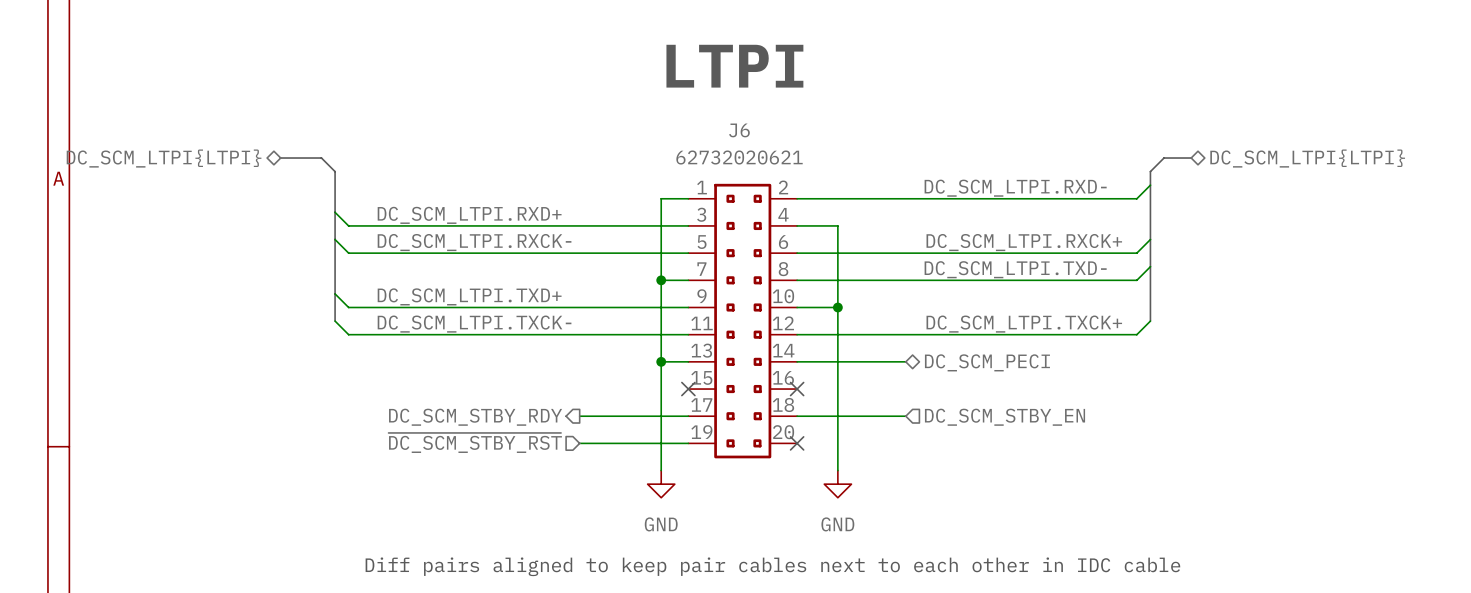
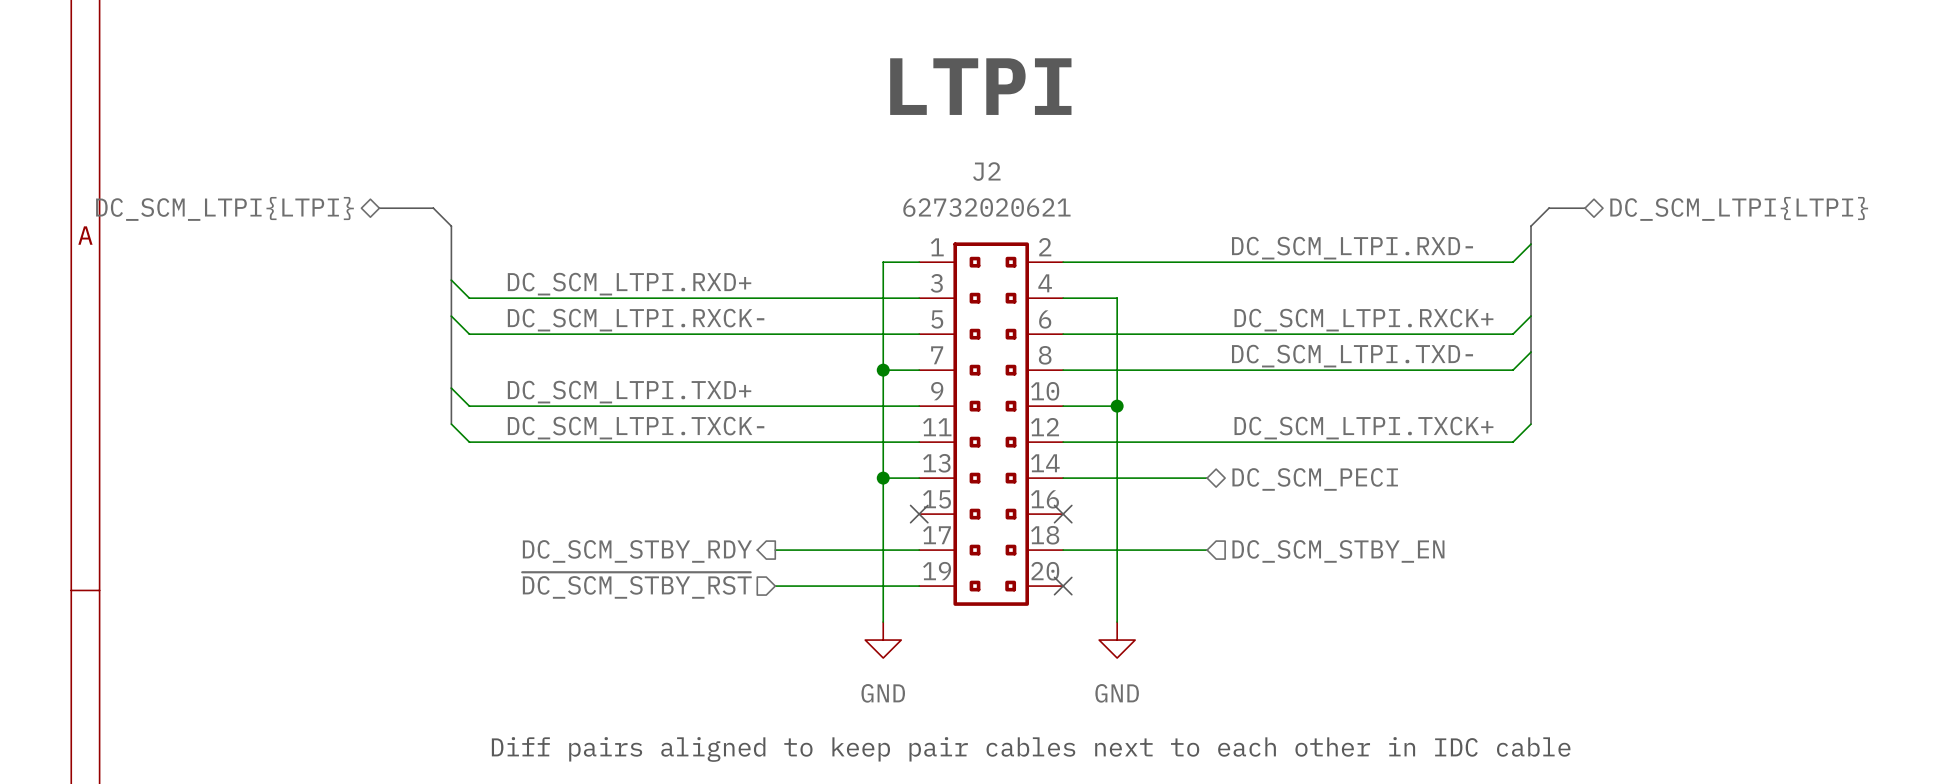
J6 name: J6 (739, 130) -> J2 (986, 171)

